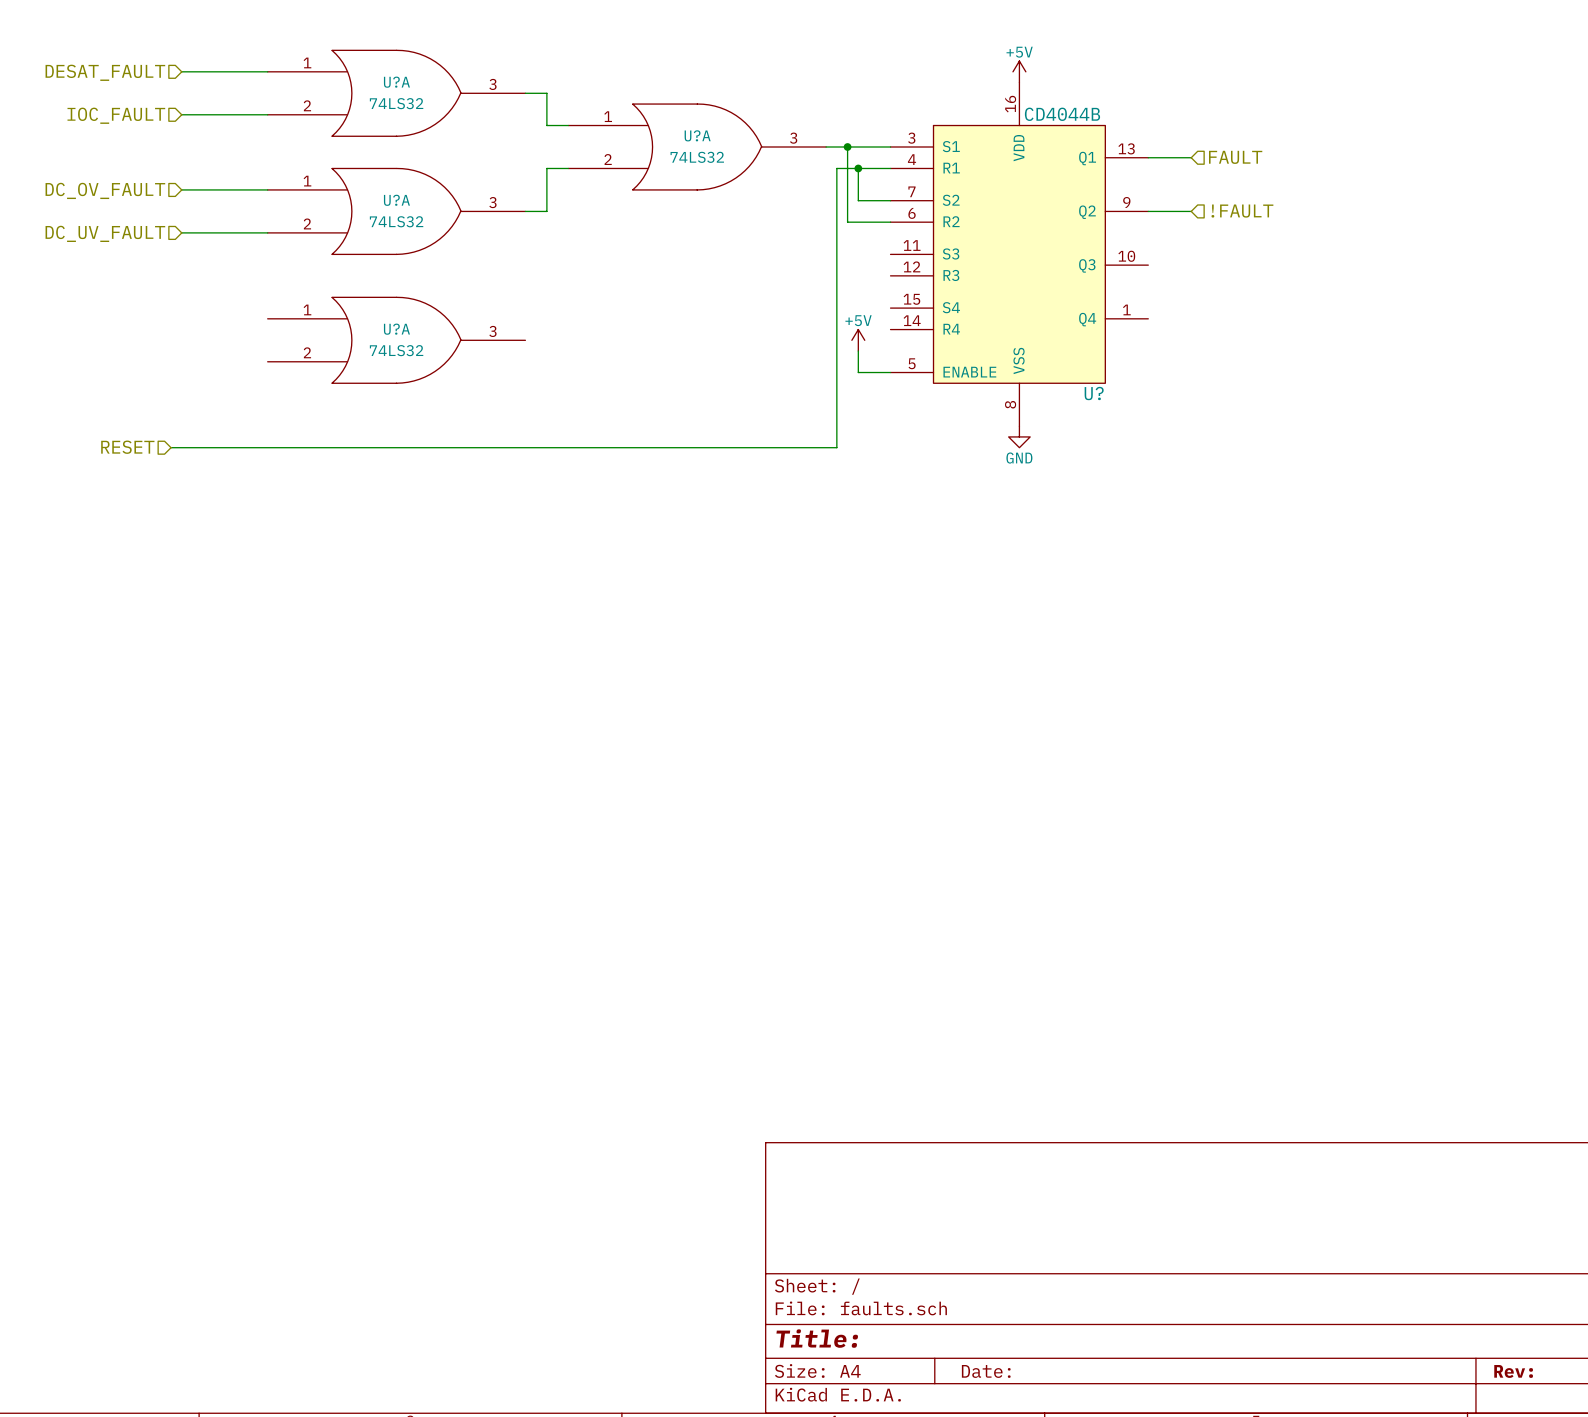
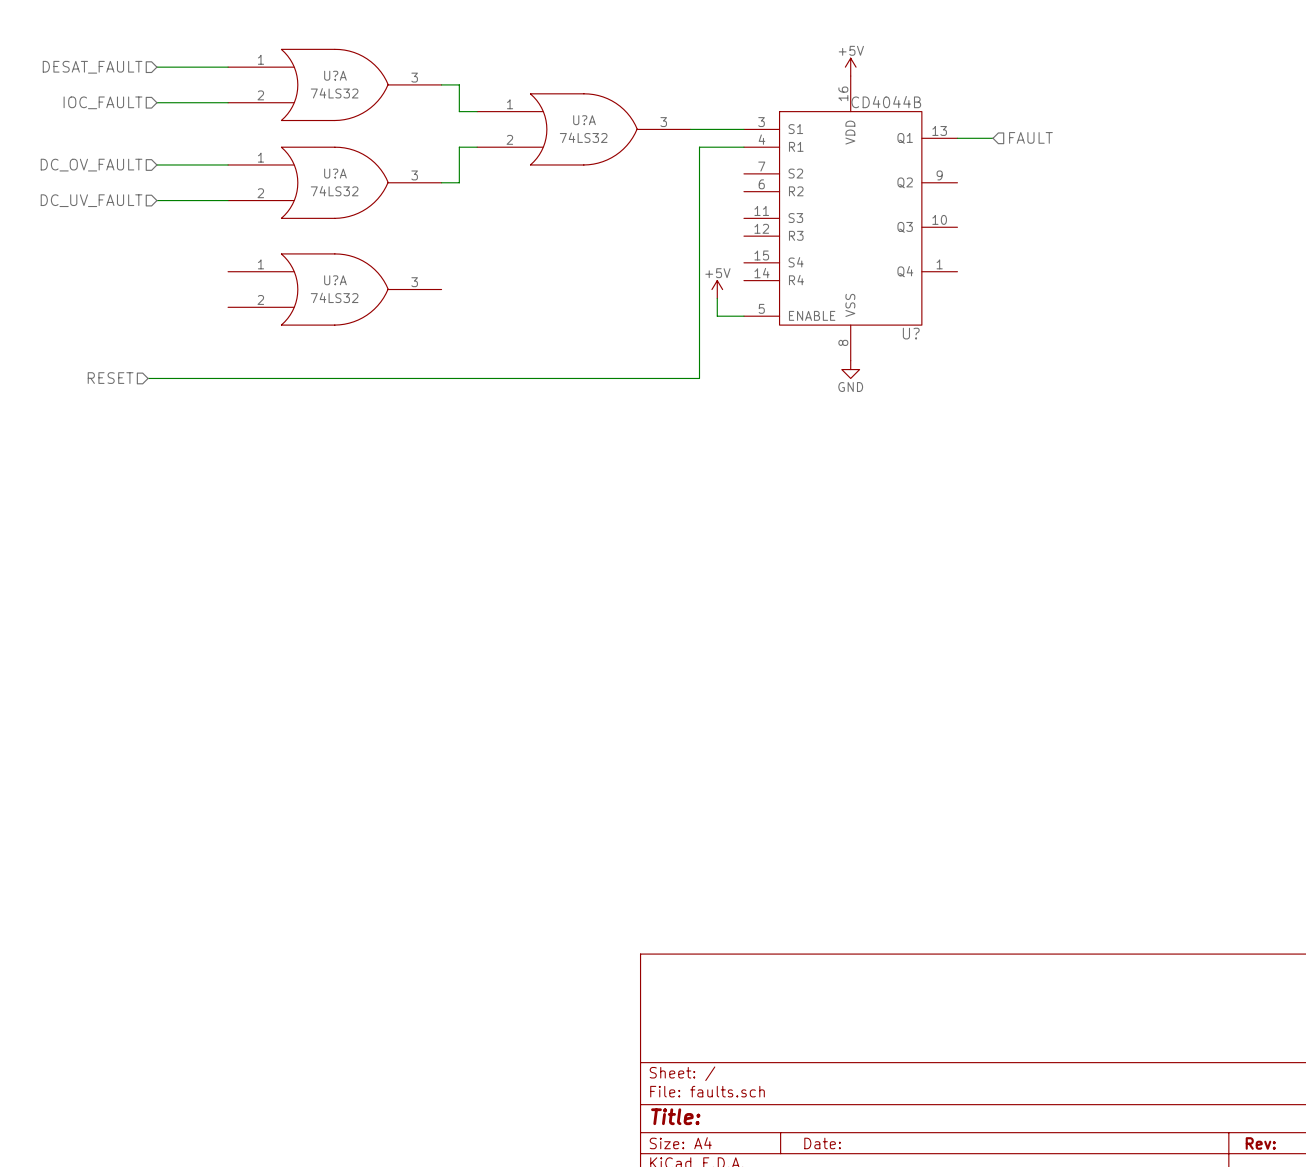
wire: (847, 147) (847, 222) (890, 222) -> none
junction: (847, 147) -> none
wire: (858, 168) (858, 200) (890, 200) -> none
junction: (858, 168) -> none
wire: (1148, 211) (1191, 211) -> none
hierarchical label: !FAULT (1242, 211) -> none

